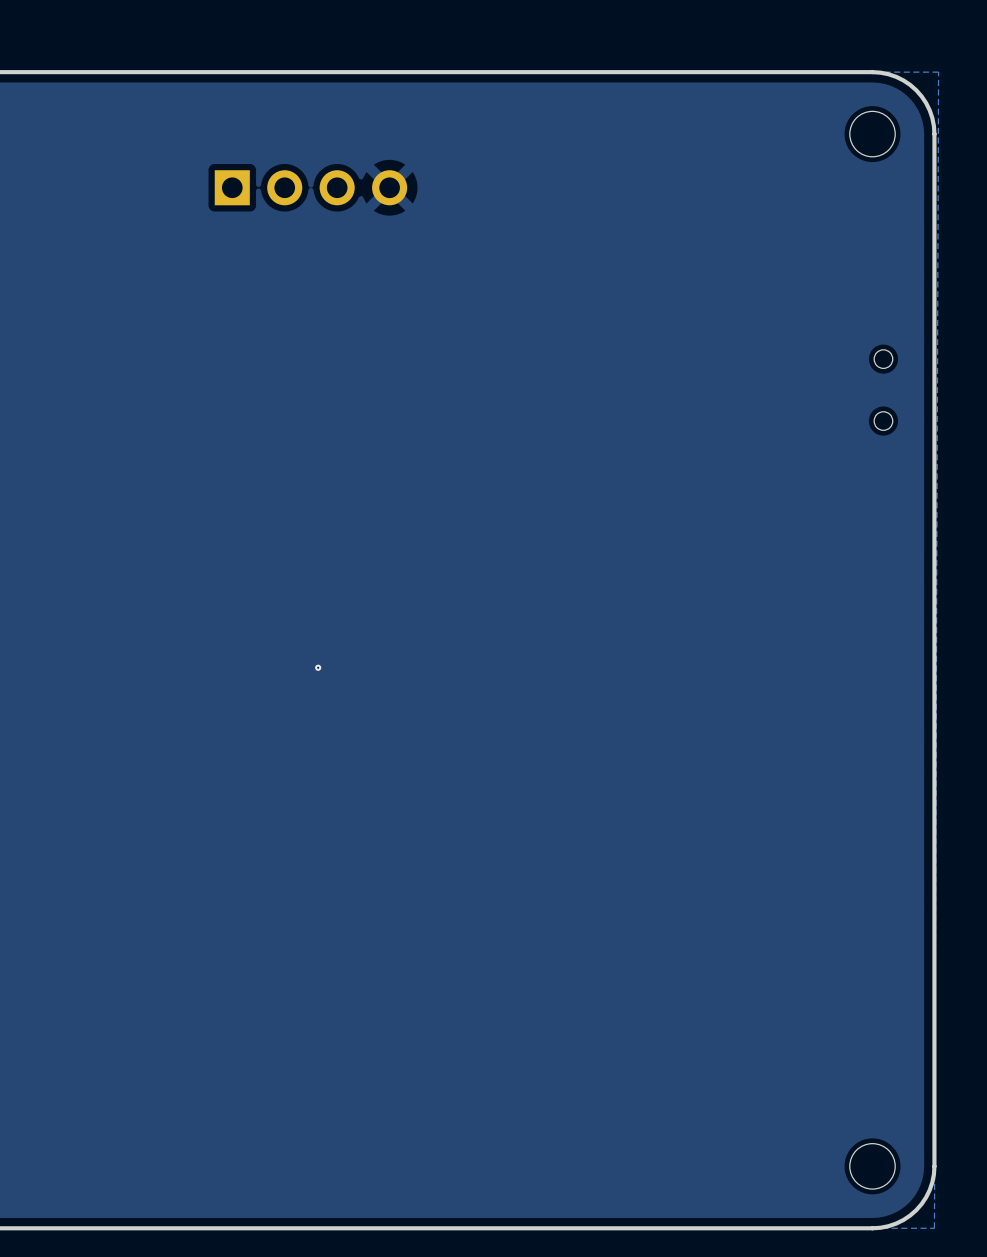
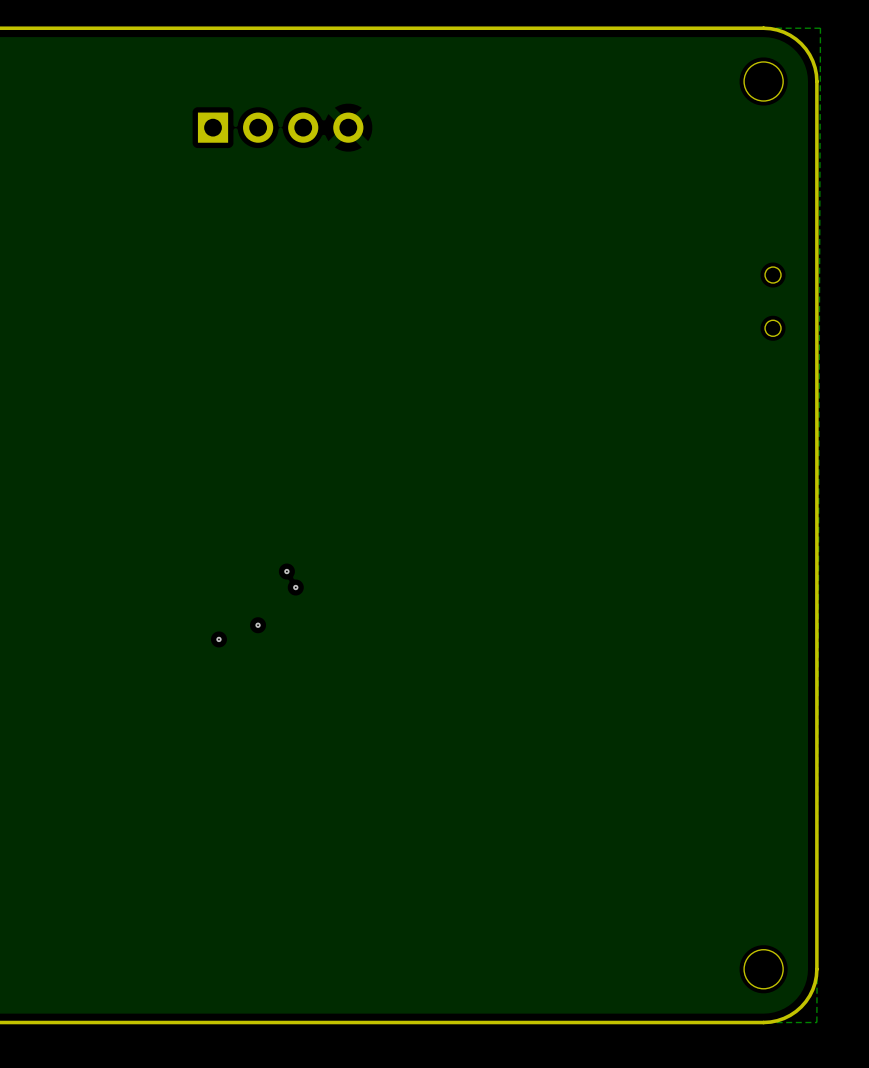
via: (318, 667) -> none
via: none -> (286, 571)
via: none -> (295, 587)
via: none -> (258, 625)
via: none -> (218, 639)

